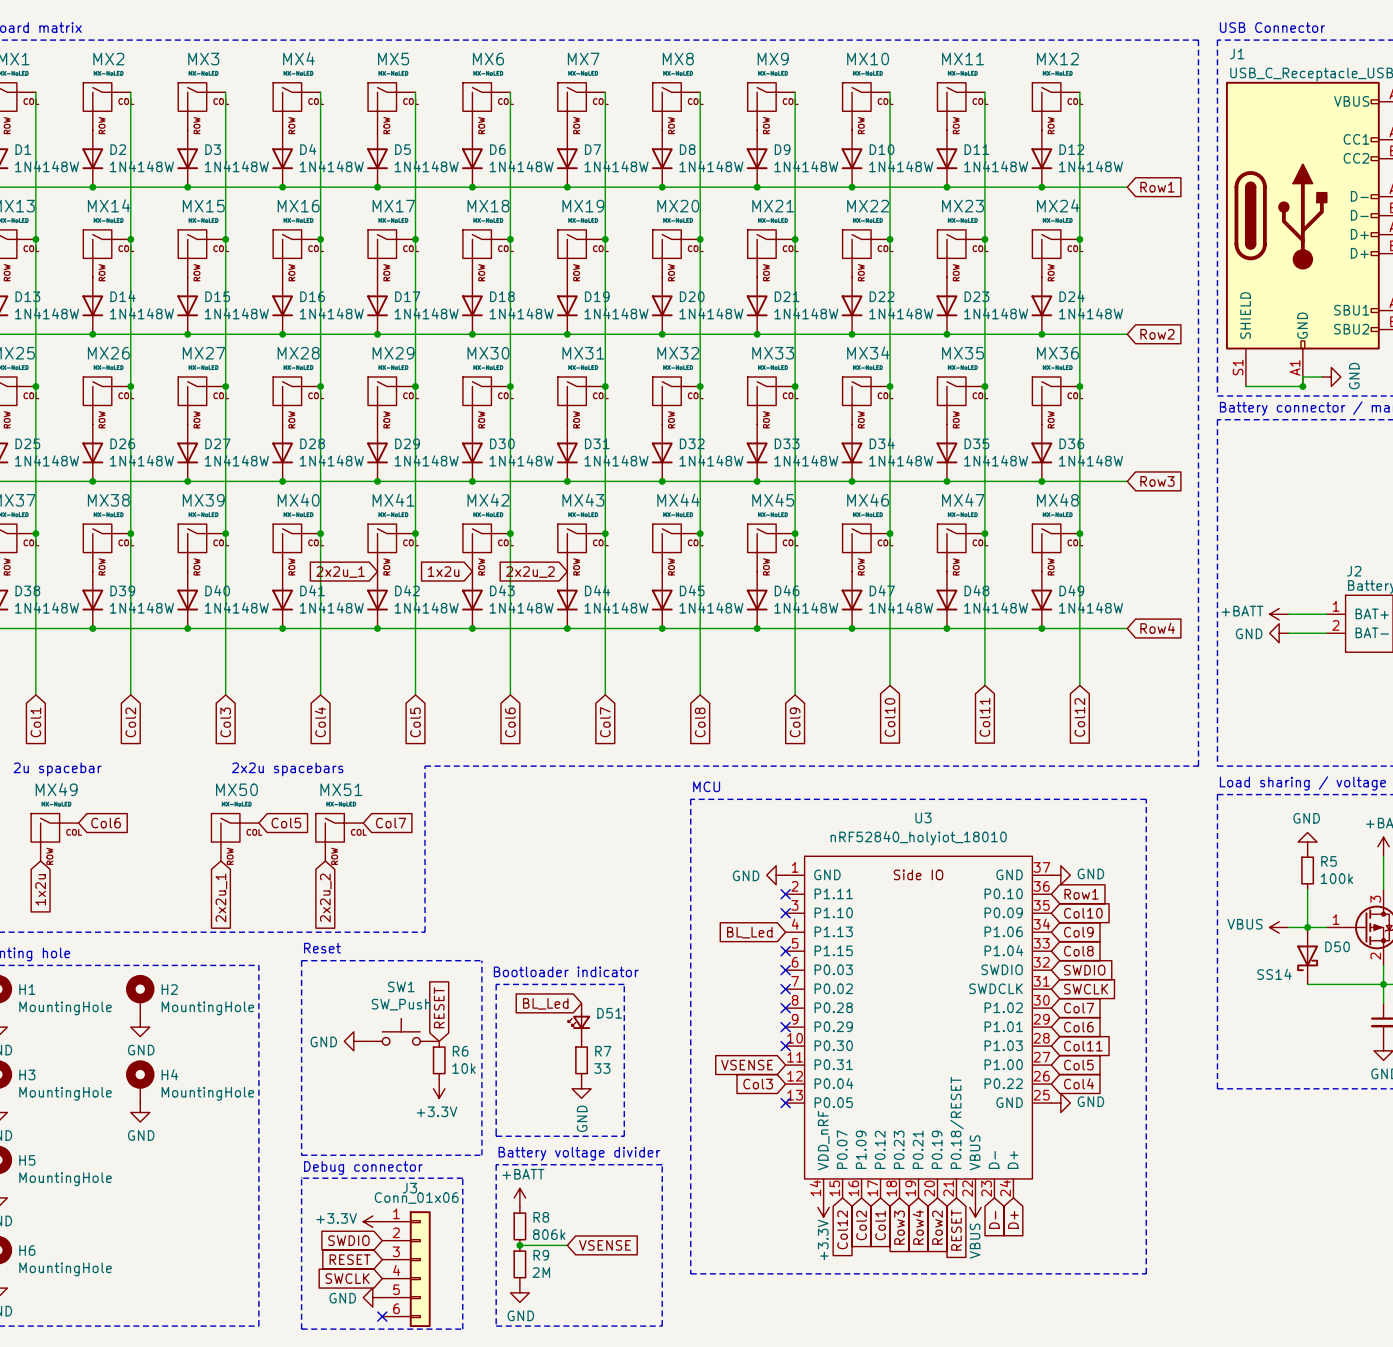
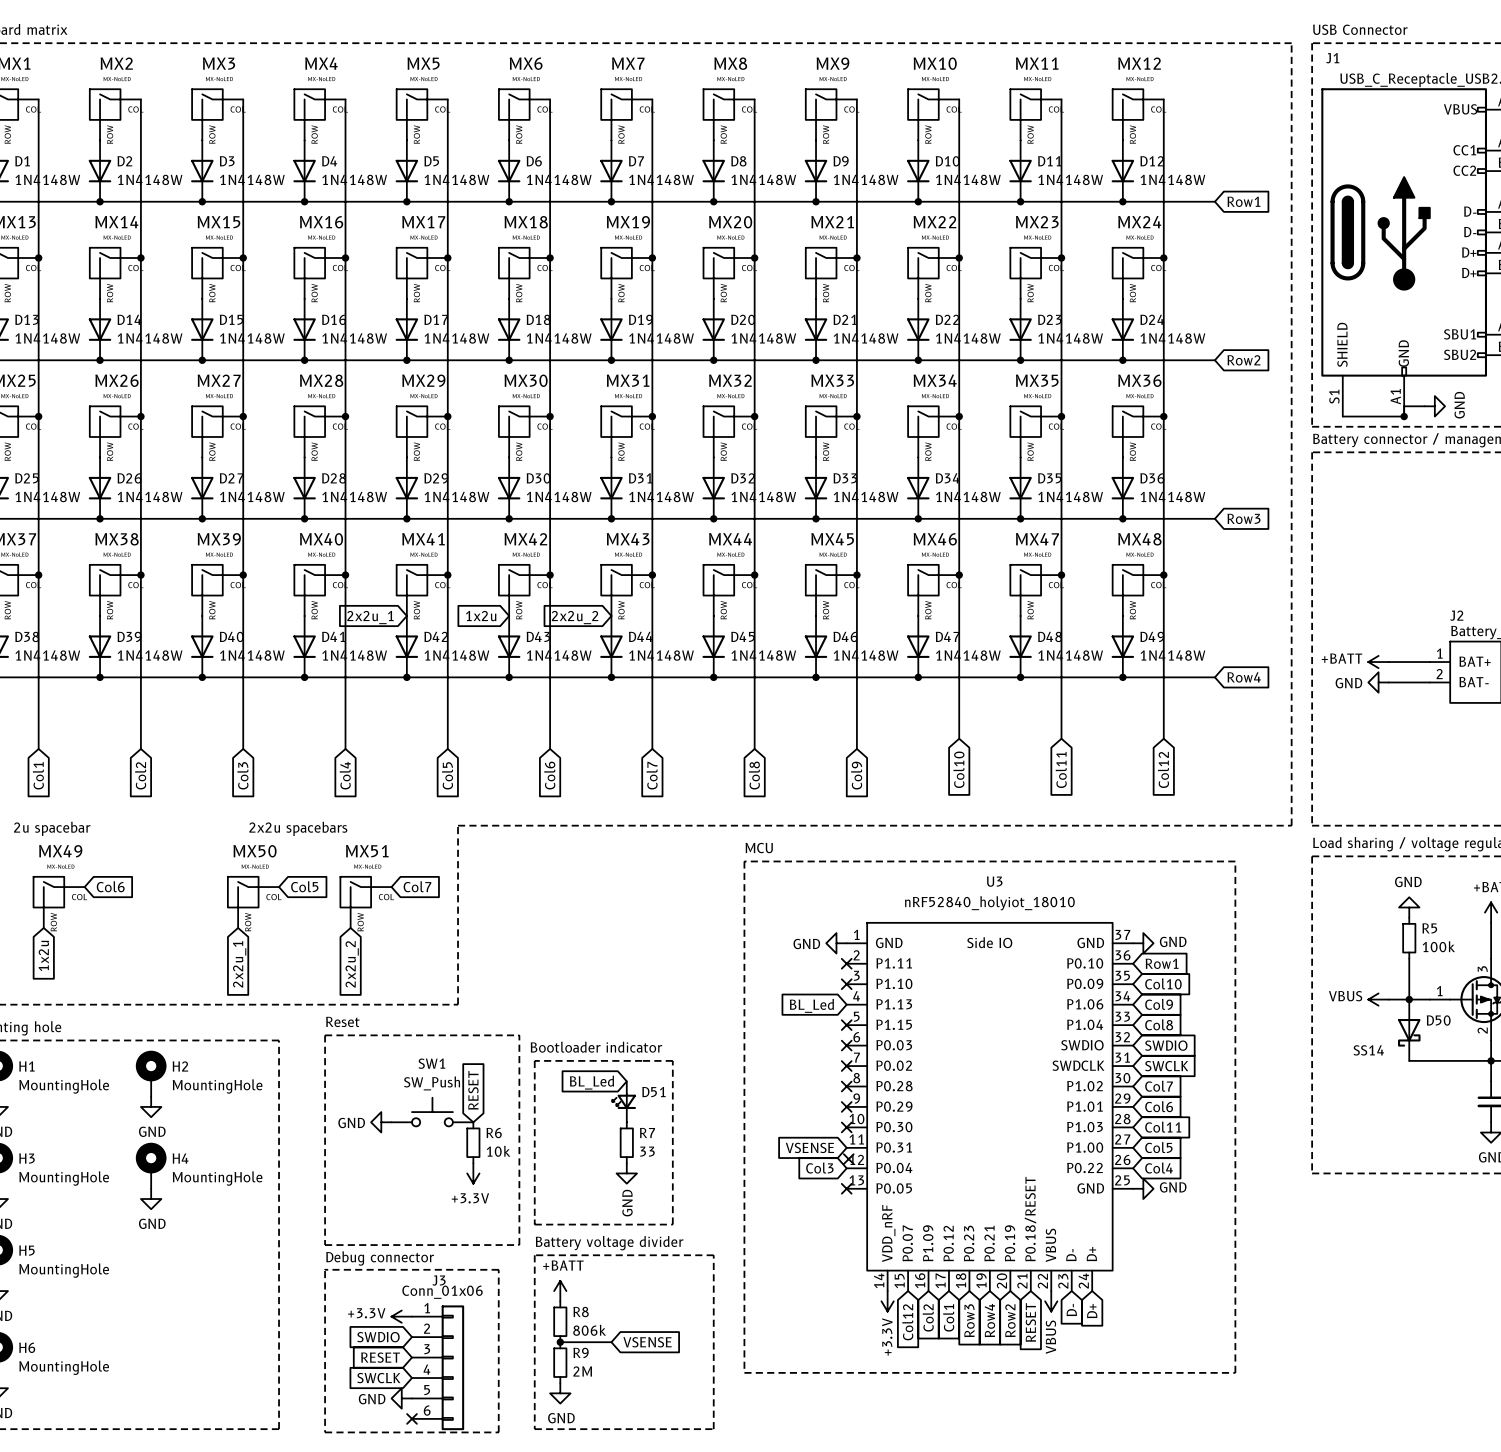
no-connect mark: none -> (848, 1159)

